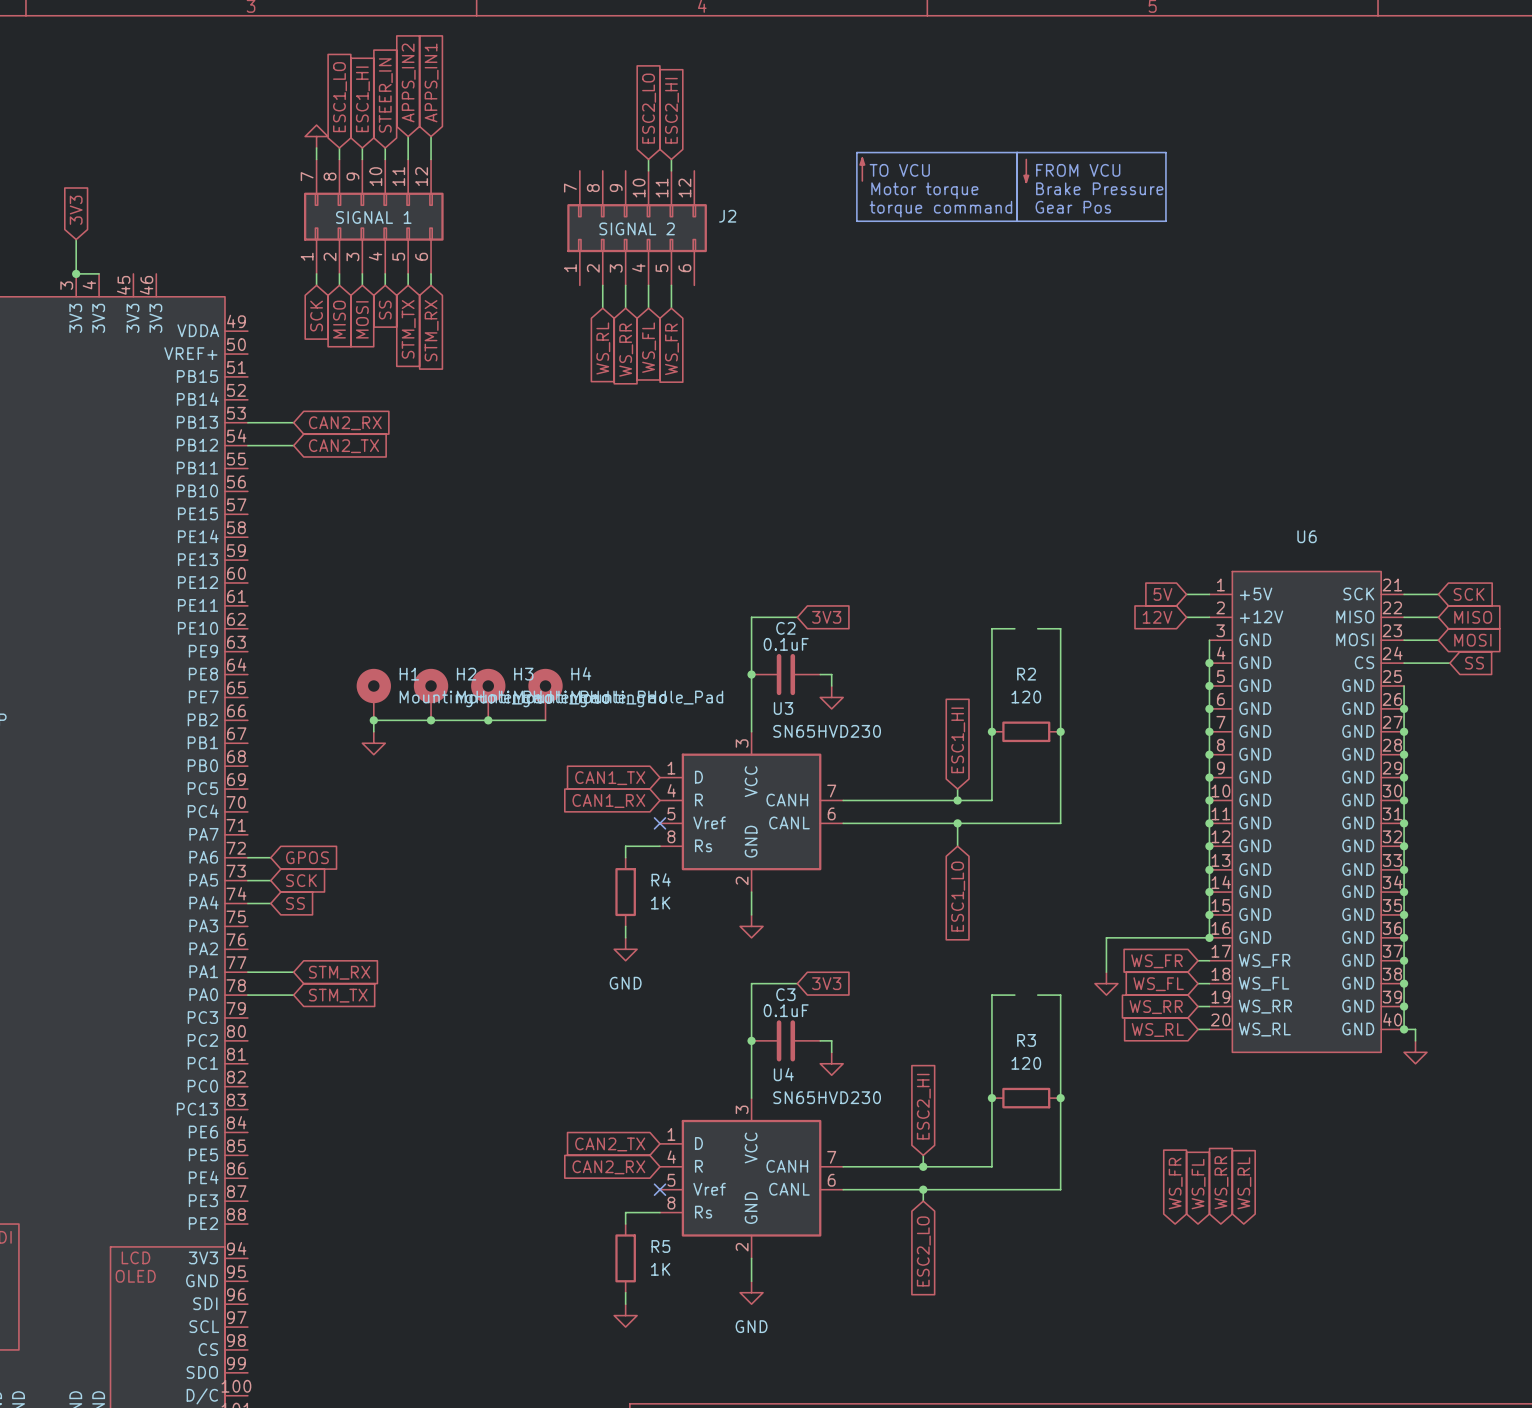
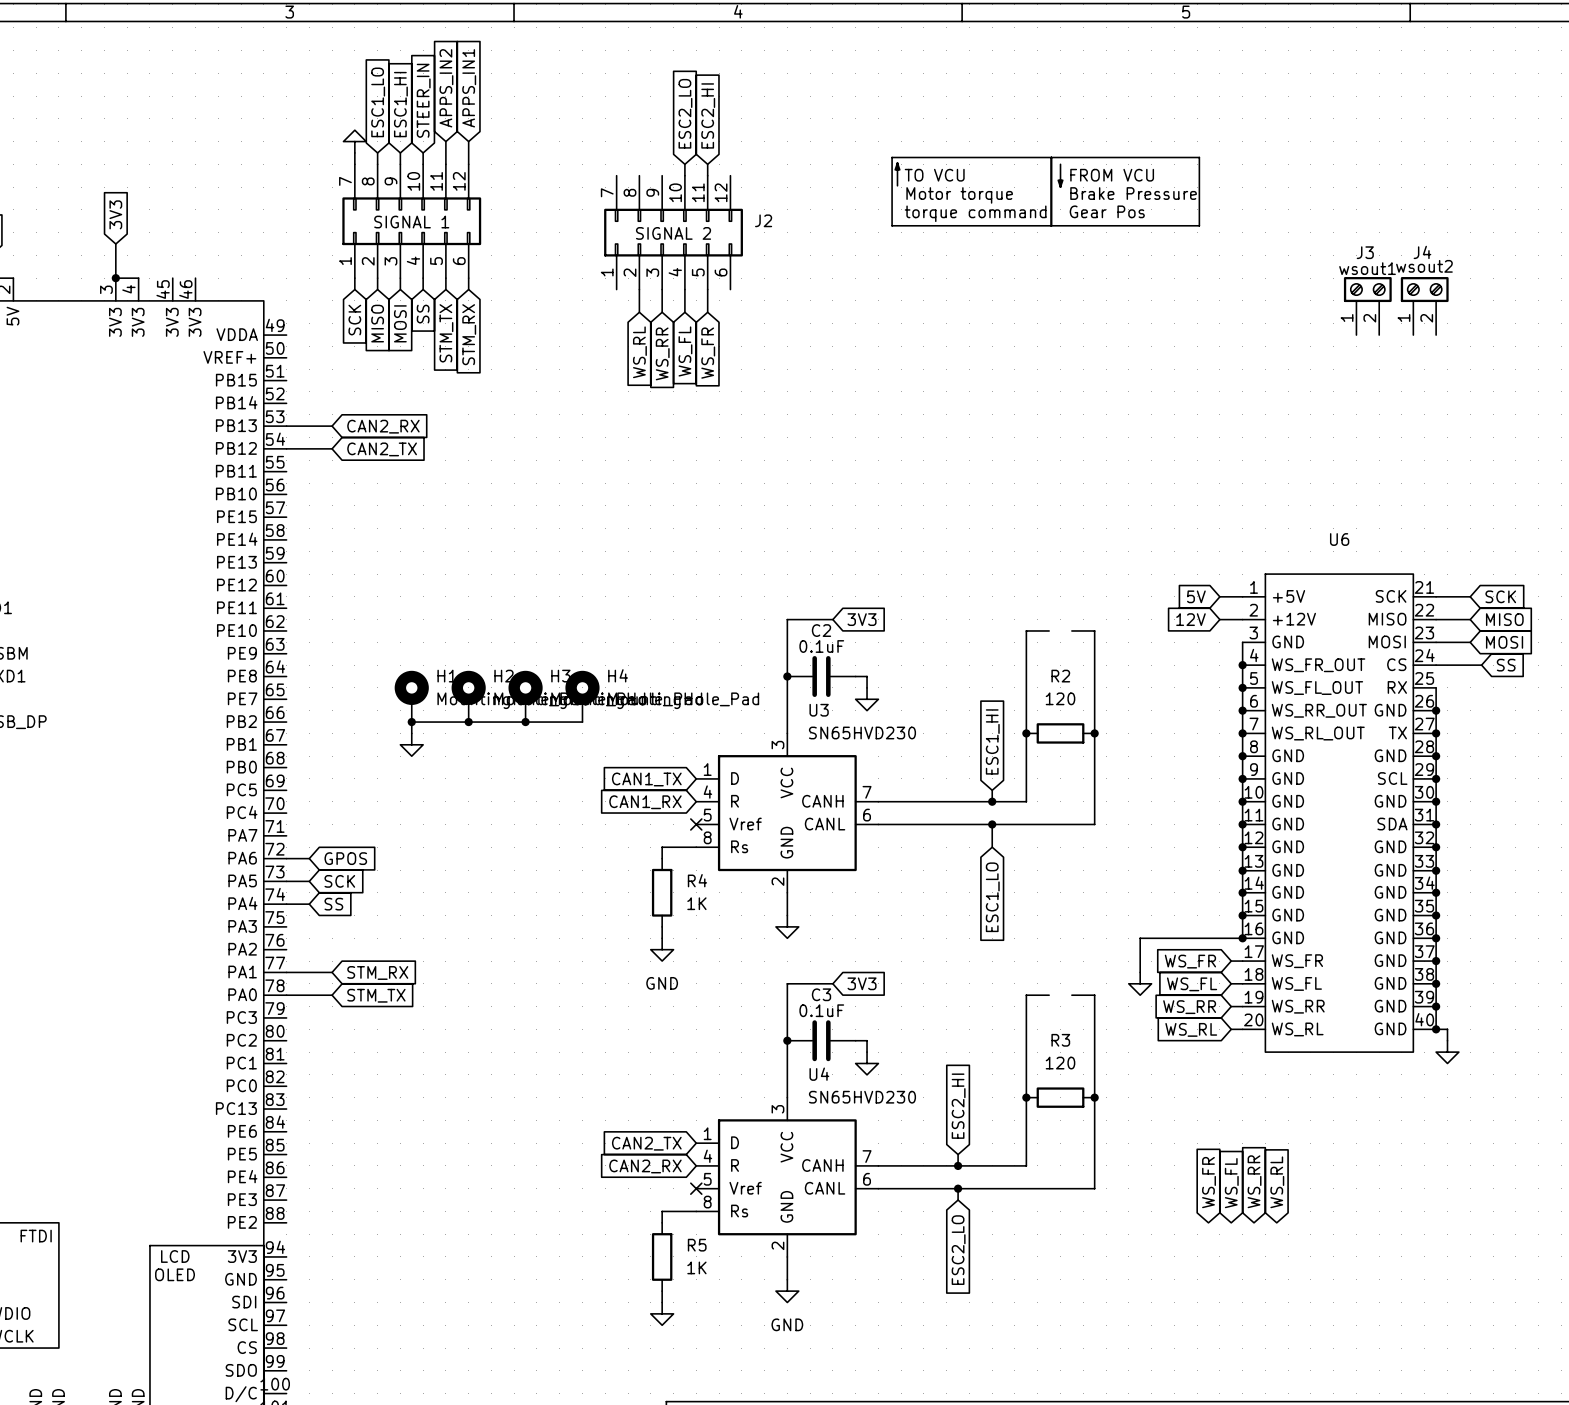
J3: none -> wsout1 (1367, 306)
J4: none -> wsout2 (1424, 306)
U6 pin name: GND (1255, 662) -> WS_FR_OUT (1318, 665)
U6 pin name: GND (1255, 685) -> WS_FL_OUT (1317, 688)
U6 pin name: GND (1358, 685) -> RX (1397, 687)
U6 pin name: GND (1255, 708) -> WS_RR_OUT (1319, 710)
U6 pin name: GND (1255, 731) -> WS_RL_OUT (1318, 733)
U6 pin name: GND (1358, 731) -> TX (1397, 732)
U6 pin name: GND (1358, 777) -> SCL (1392, 778)
U6 pin name: GND (1358, 822) -> SDA (1392, 824)

